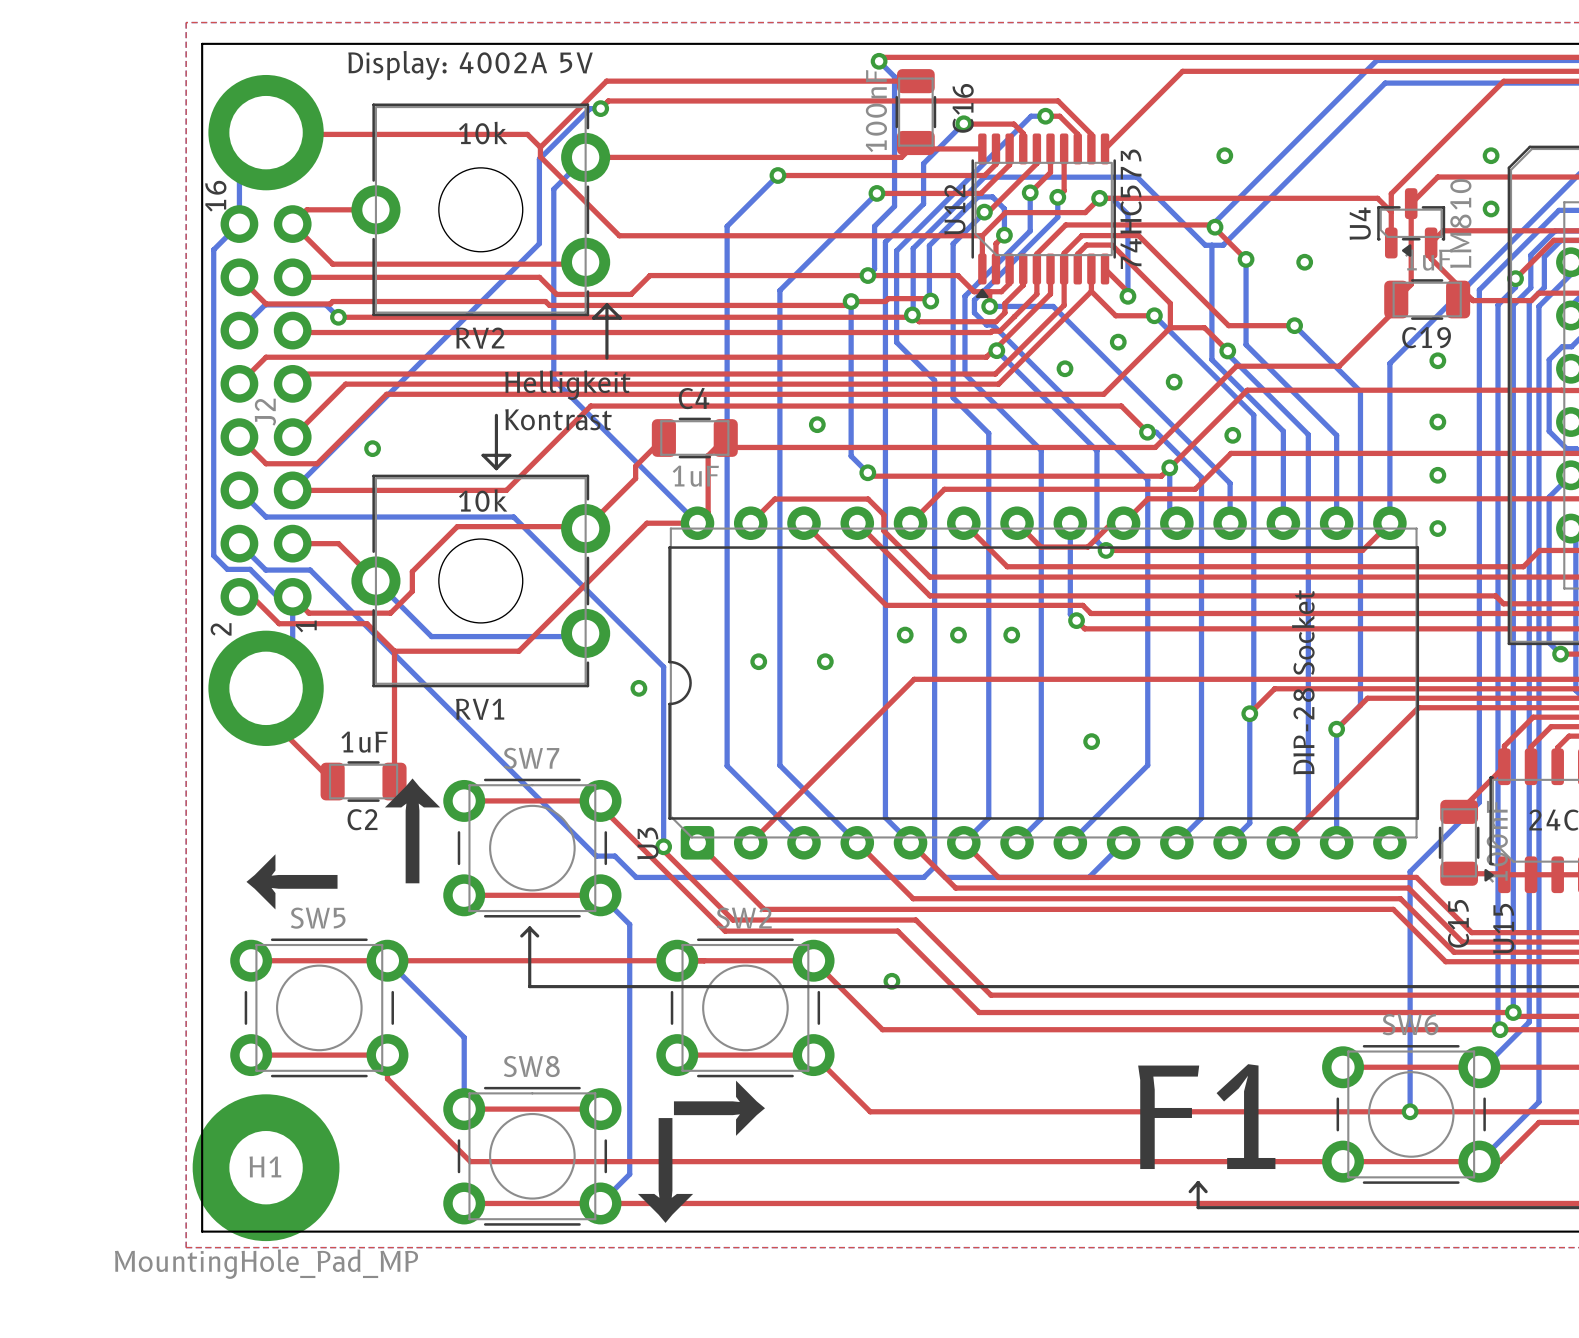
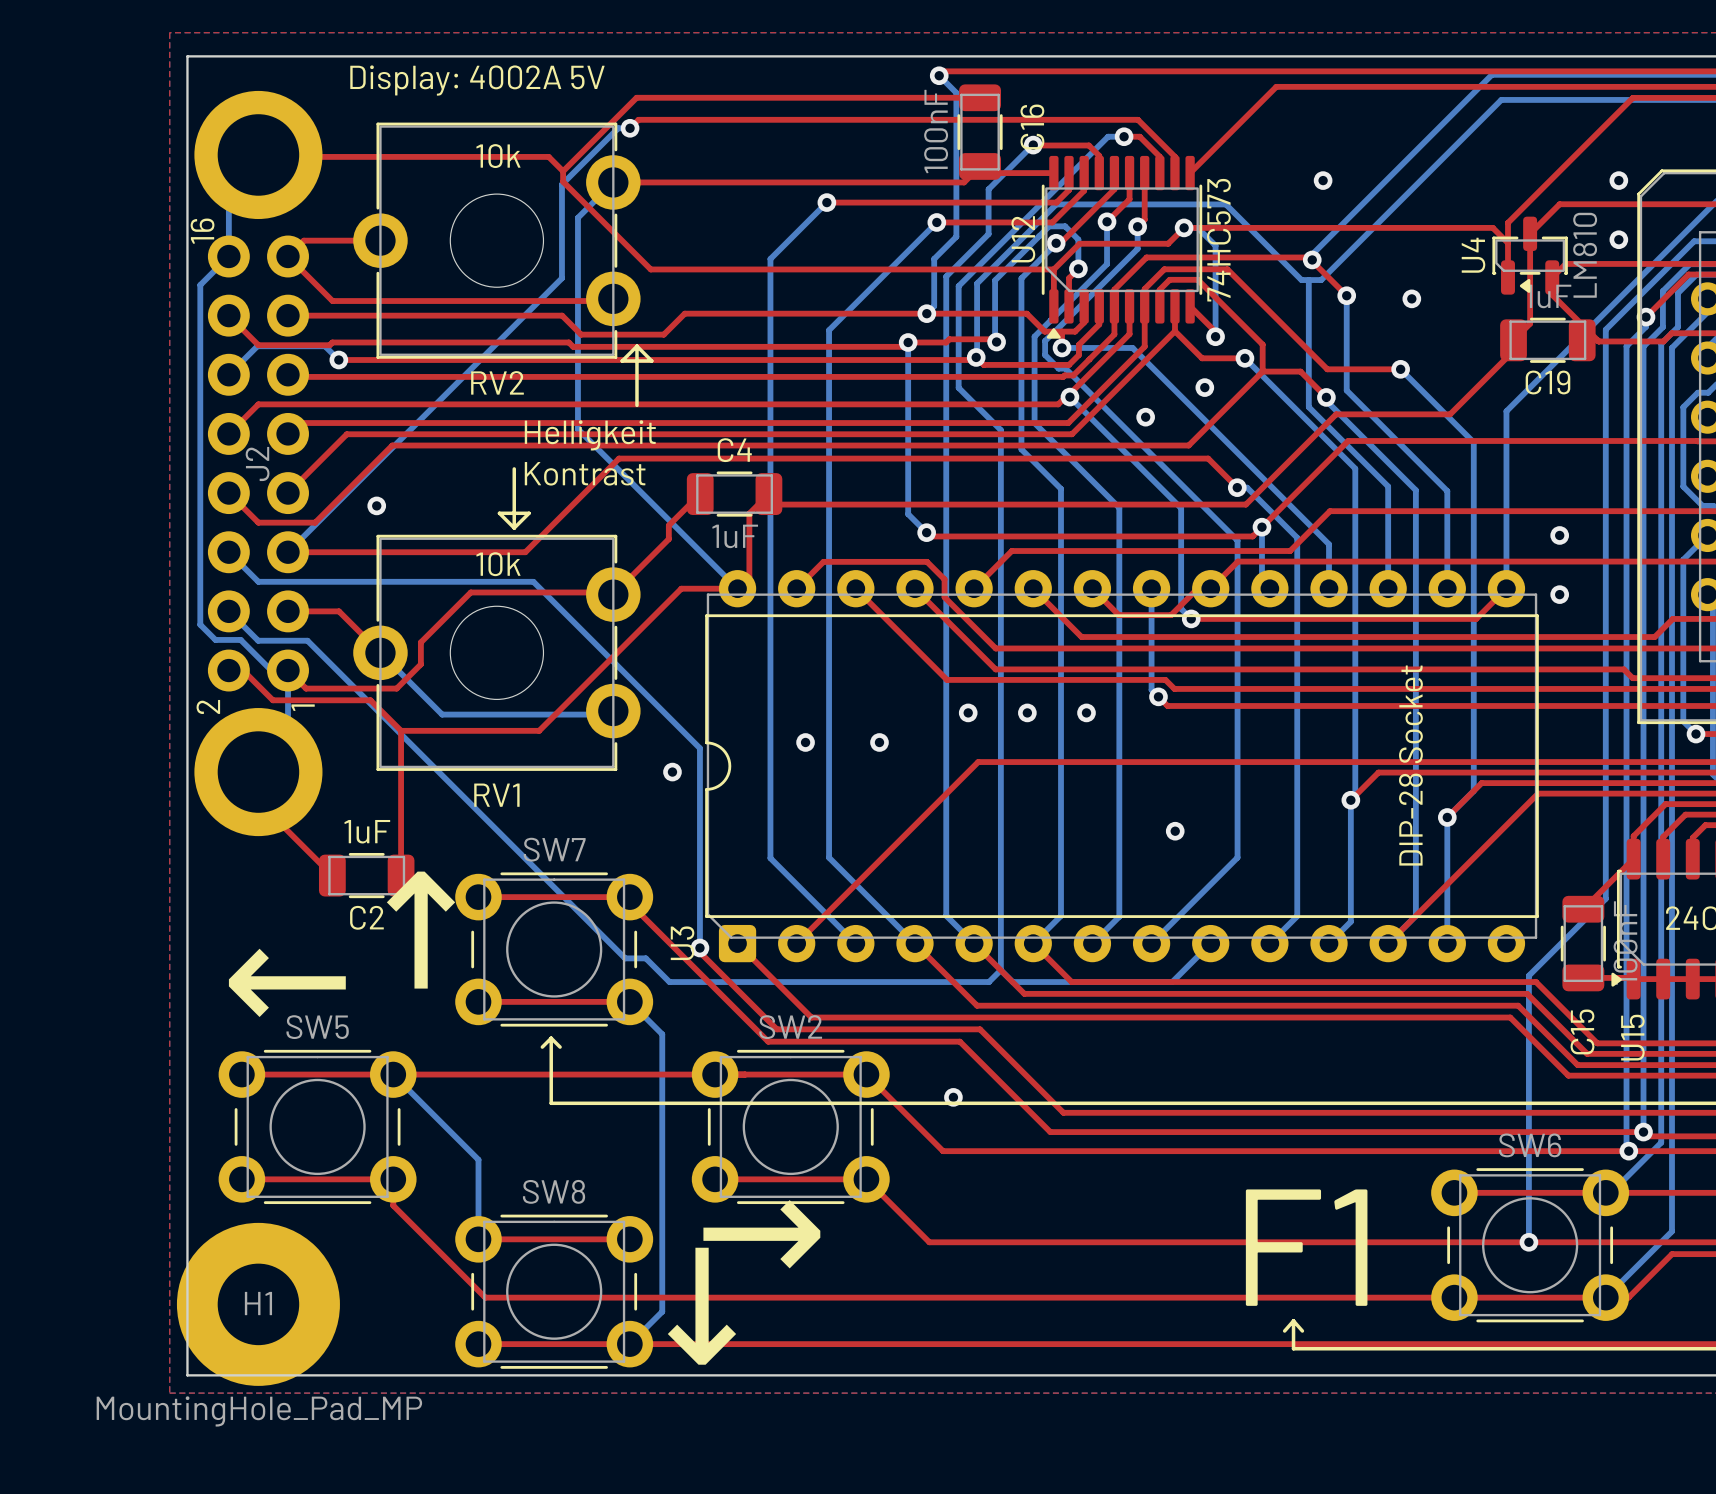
via: (1437, 360) -> none
via: (1174, 382) -> none
via: (1437, 422) -> none
via: (817, 424) -> none
via: (1232, 435) -> none

